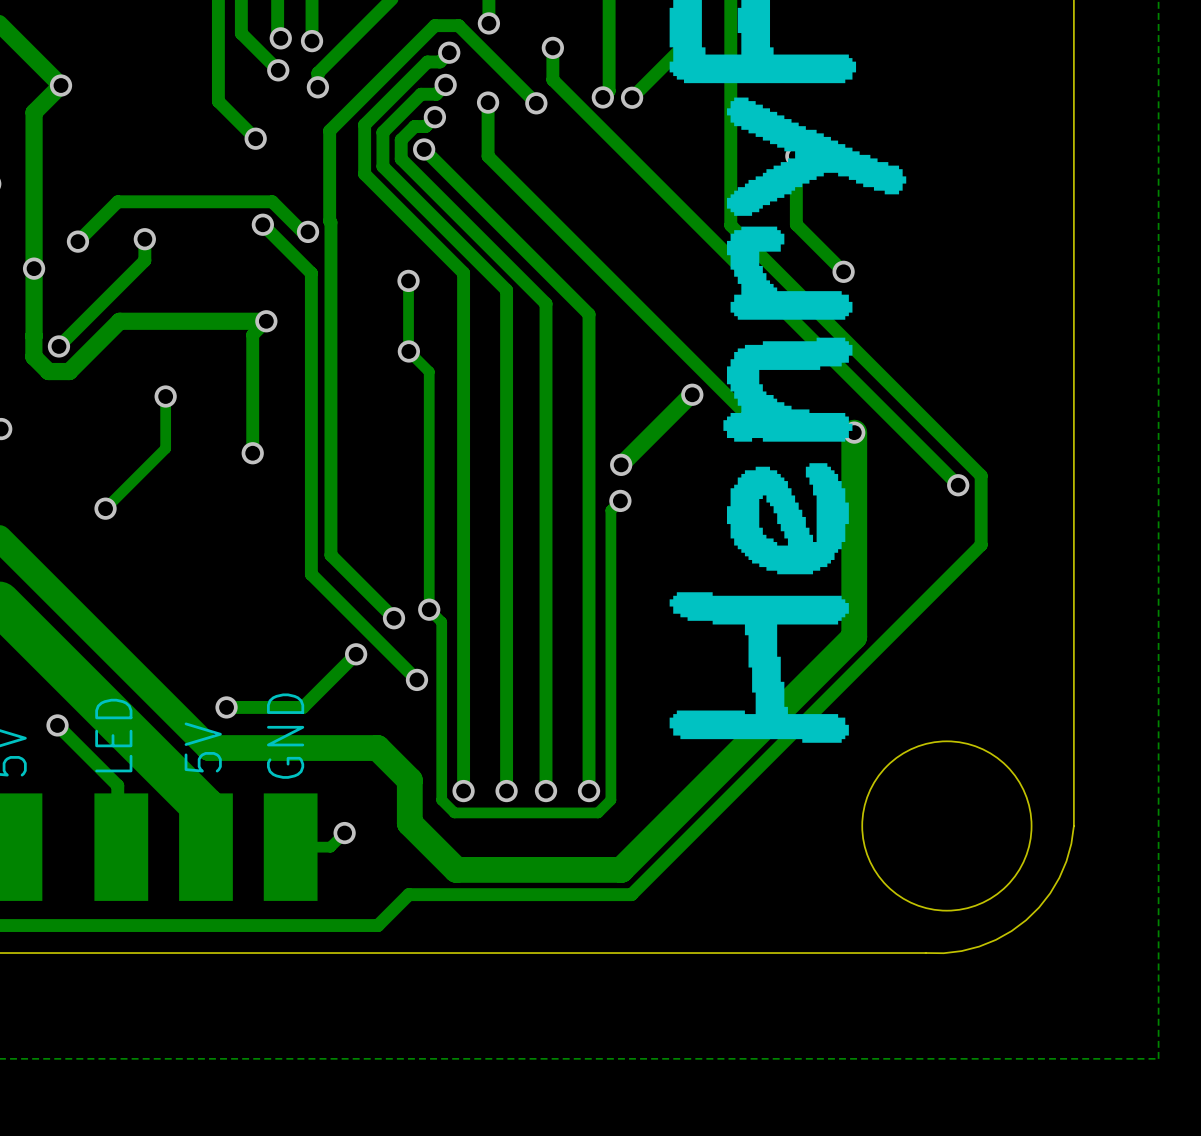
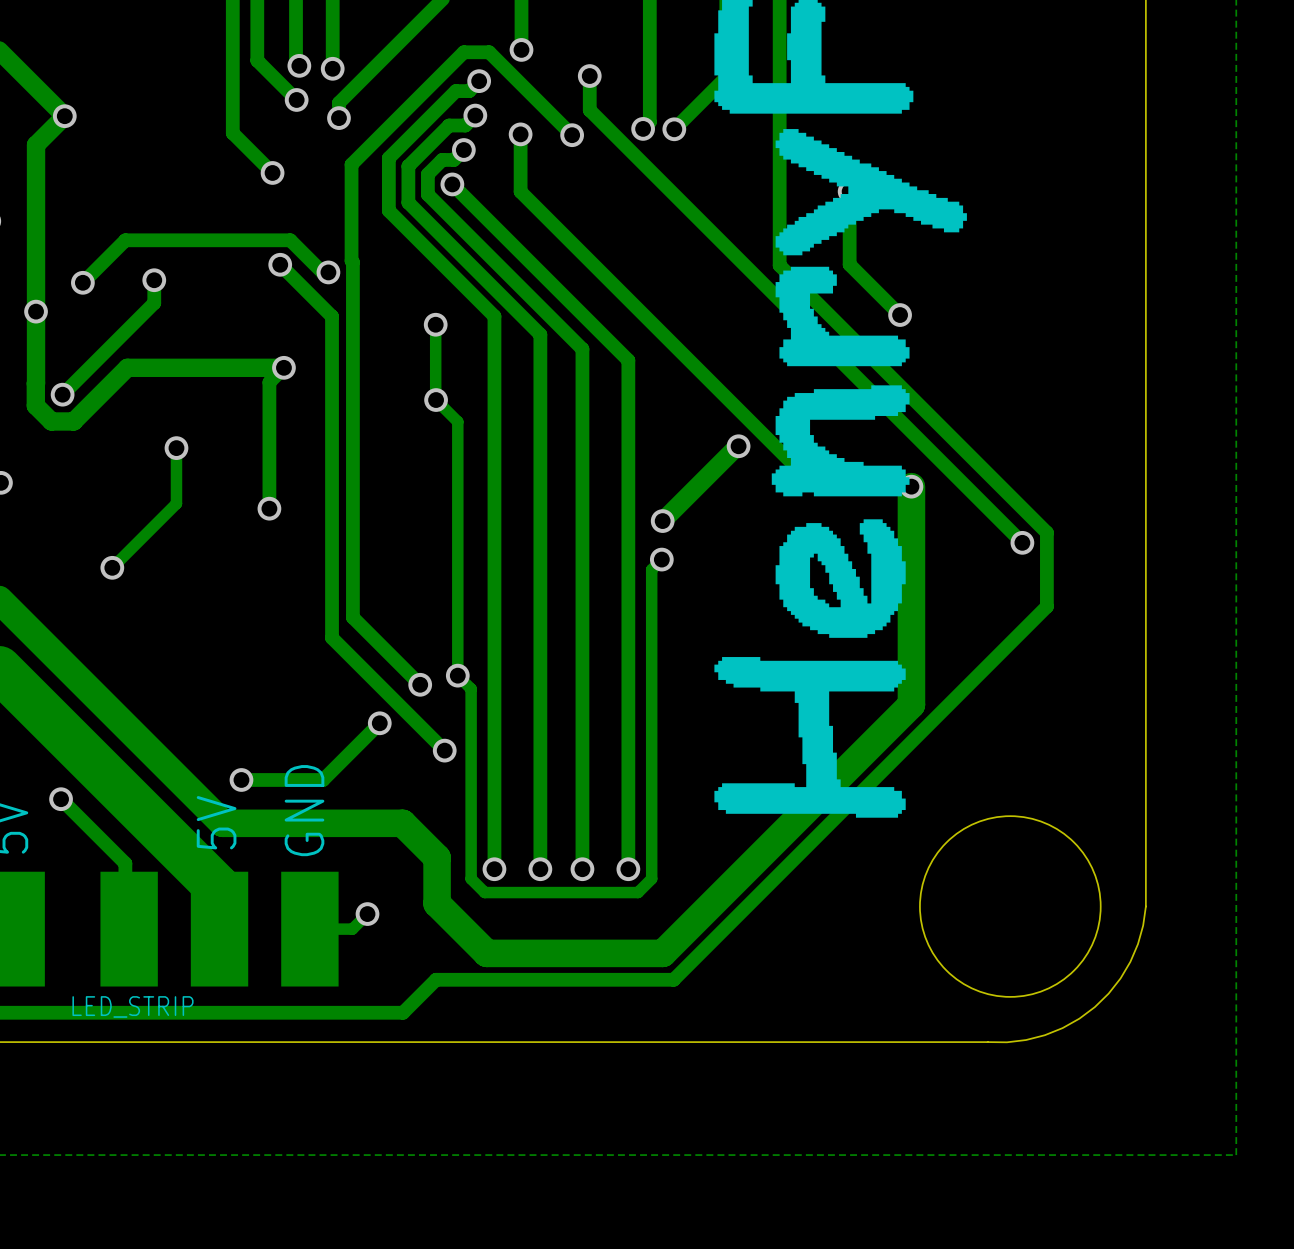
part value: LED (113, 735) -> LED_STRIP (132, 1006)

